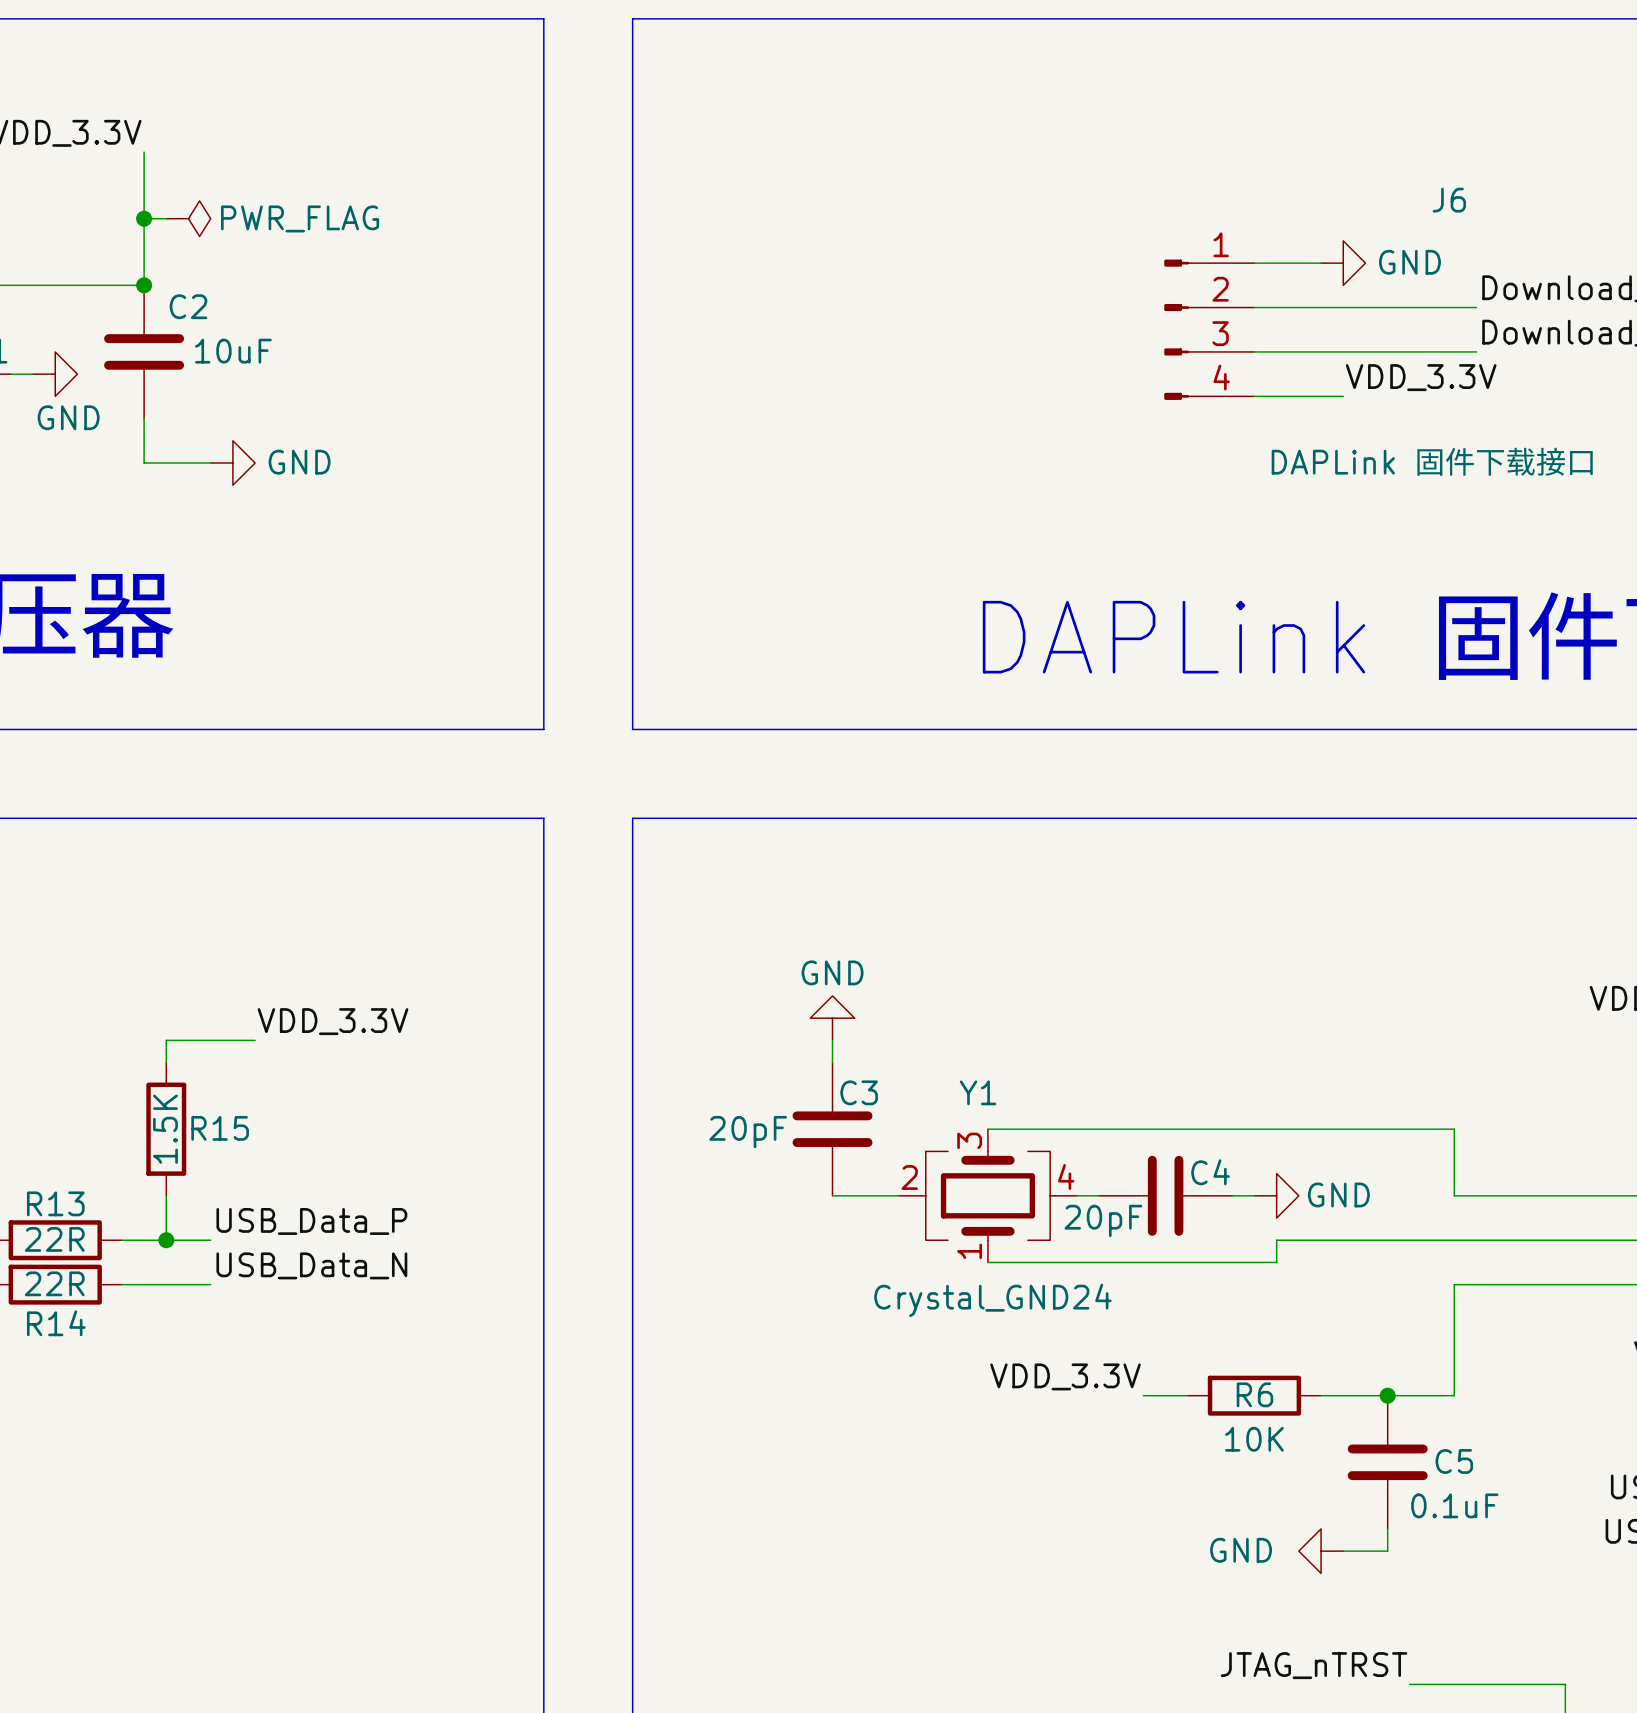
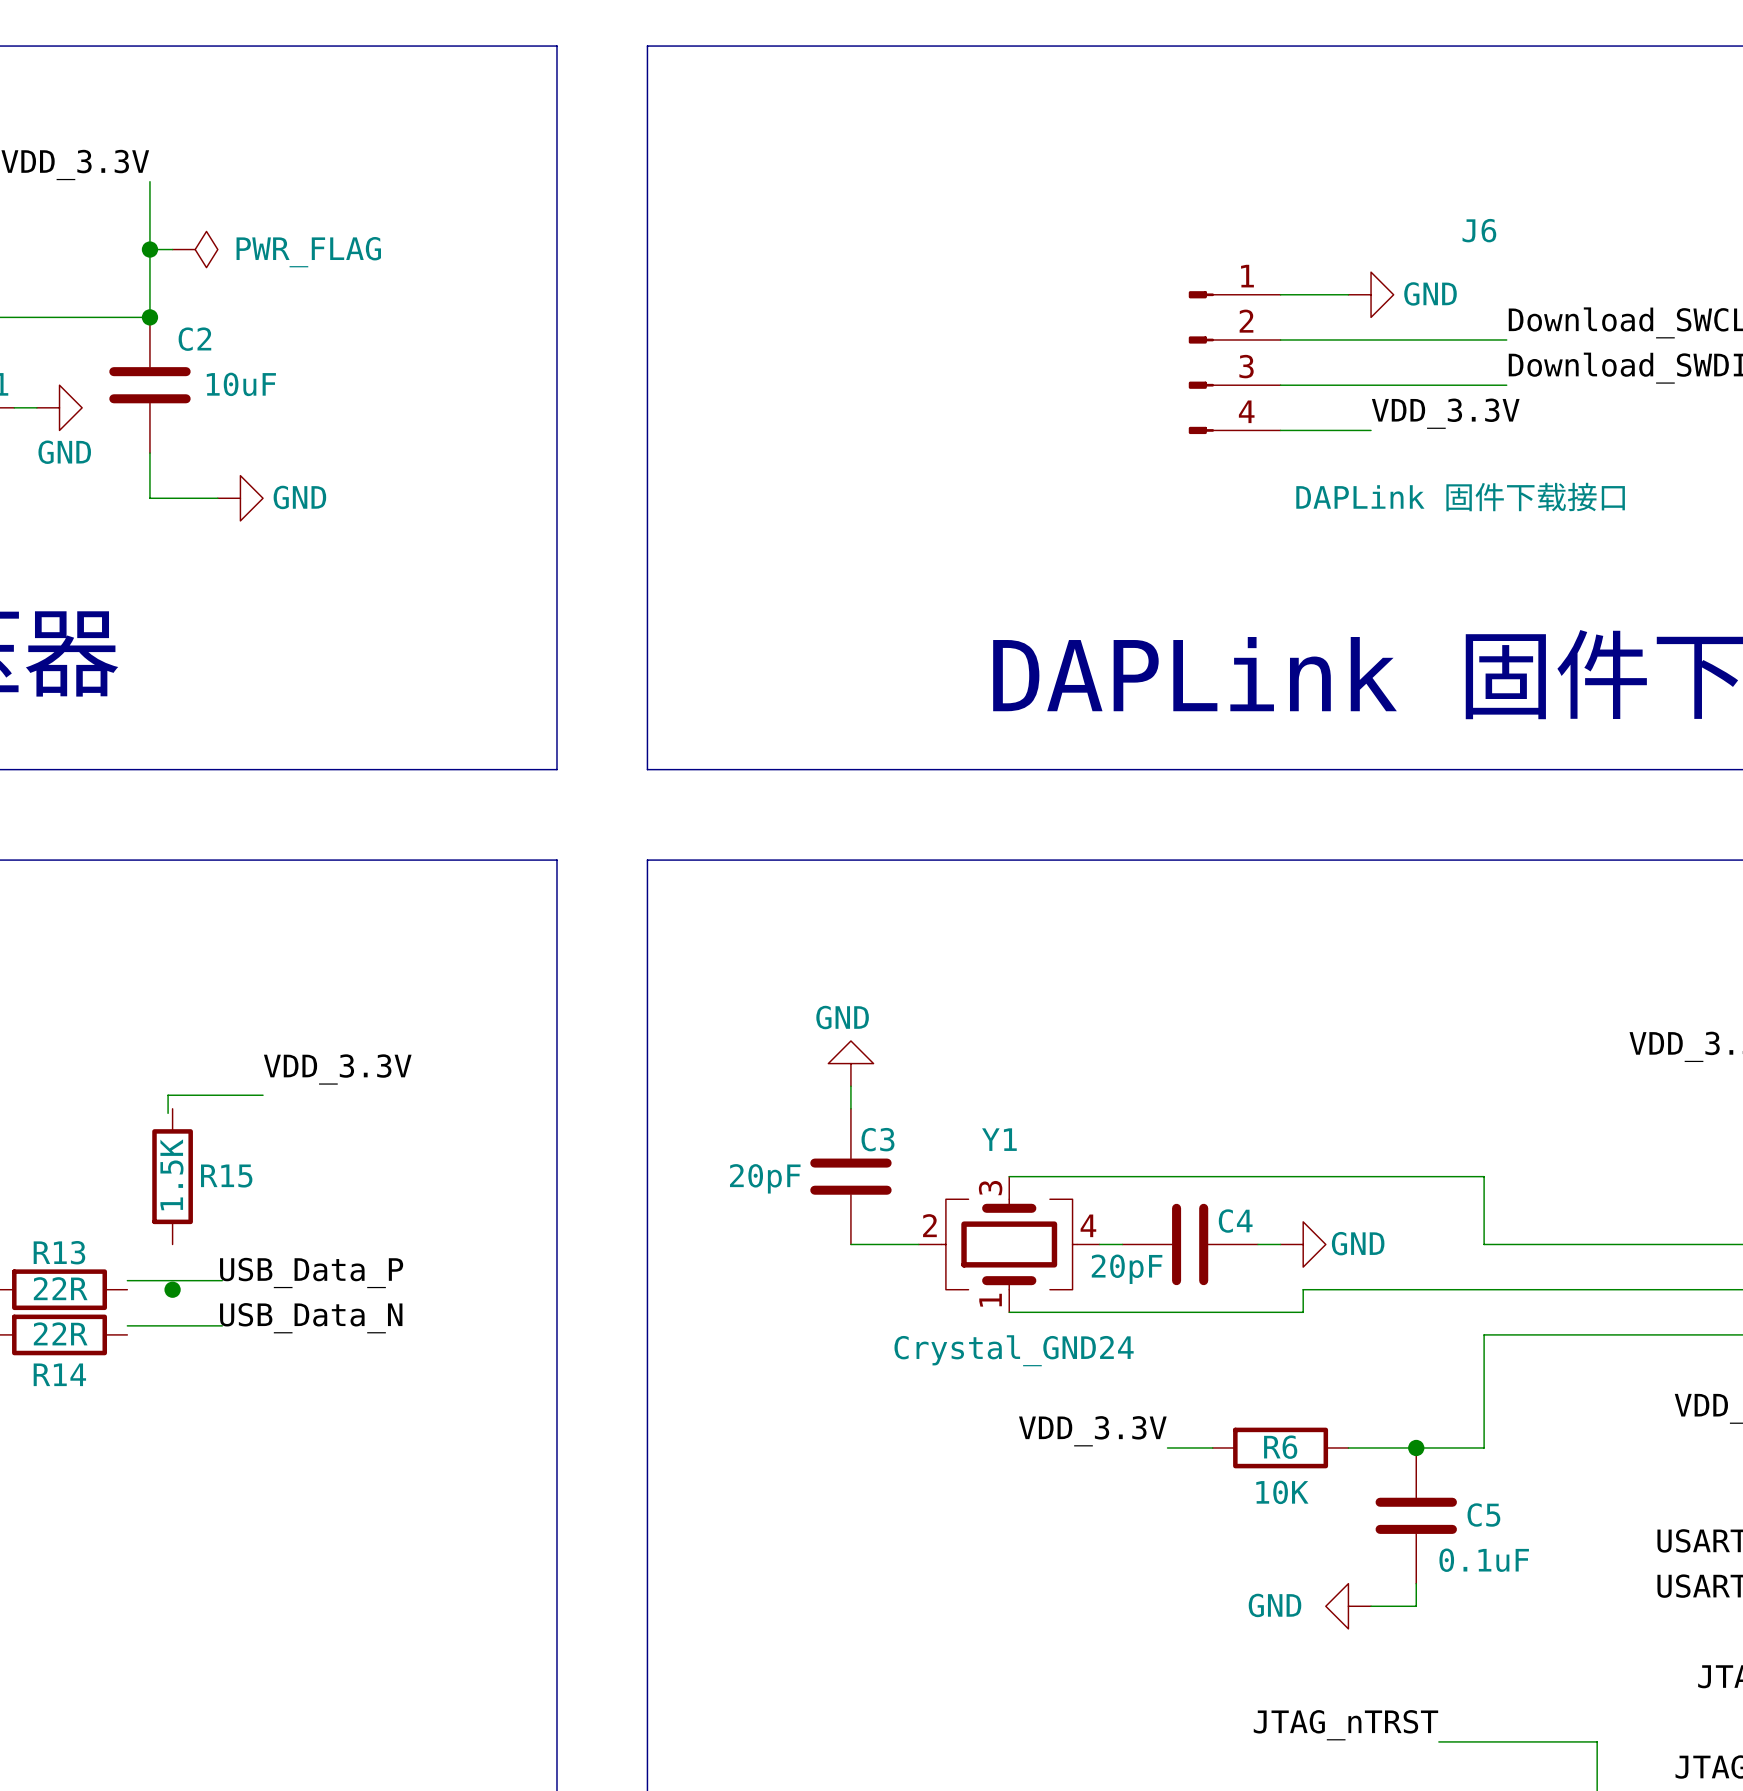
wire: (255, 1040) (166, 1040) (166, 1062) -> none
wire: none -> (263, 1095) (168, 1095) (168, 1113)
wire: (166, 1195) (166, 1240) -> none
wire: none -> (127, 1280) (222, 1280)
wire: (121, 1240) (210, 1240) -> none
wire: none -> (127, 1325) (222, 1325)
wire: (121, 1284) (210, 1284) -> none

